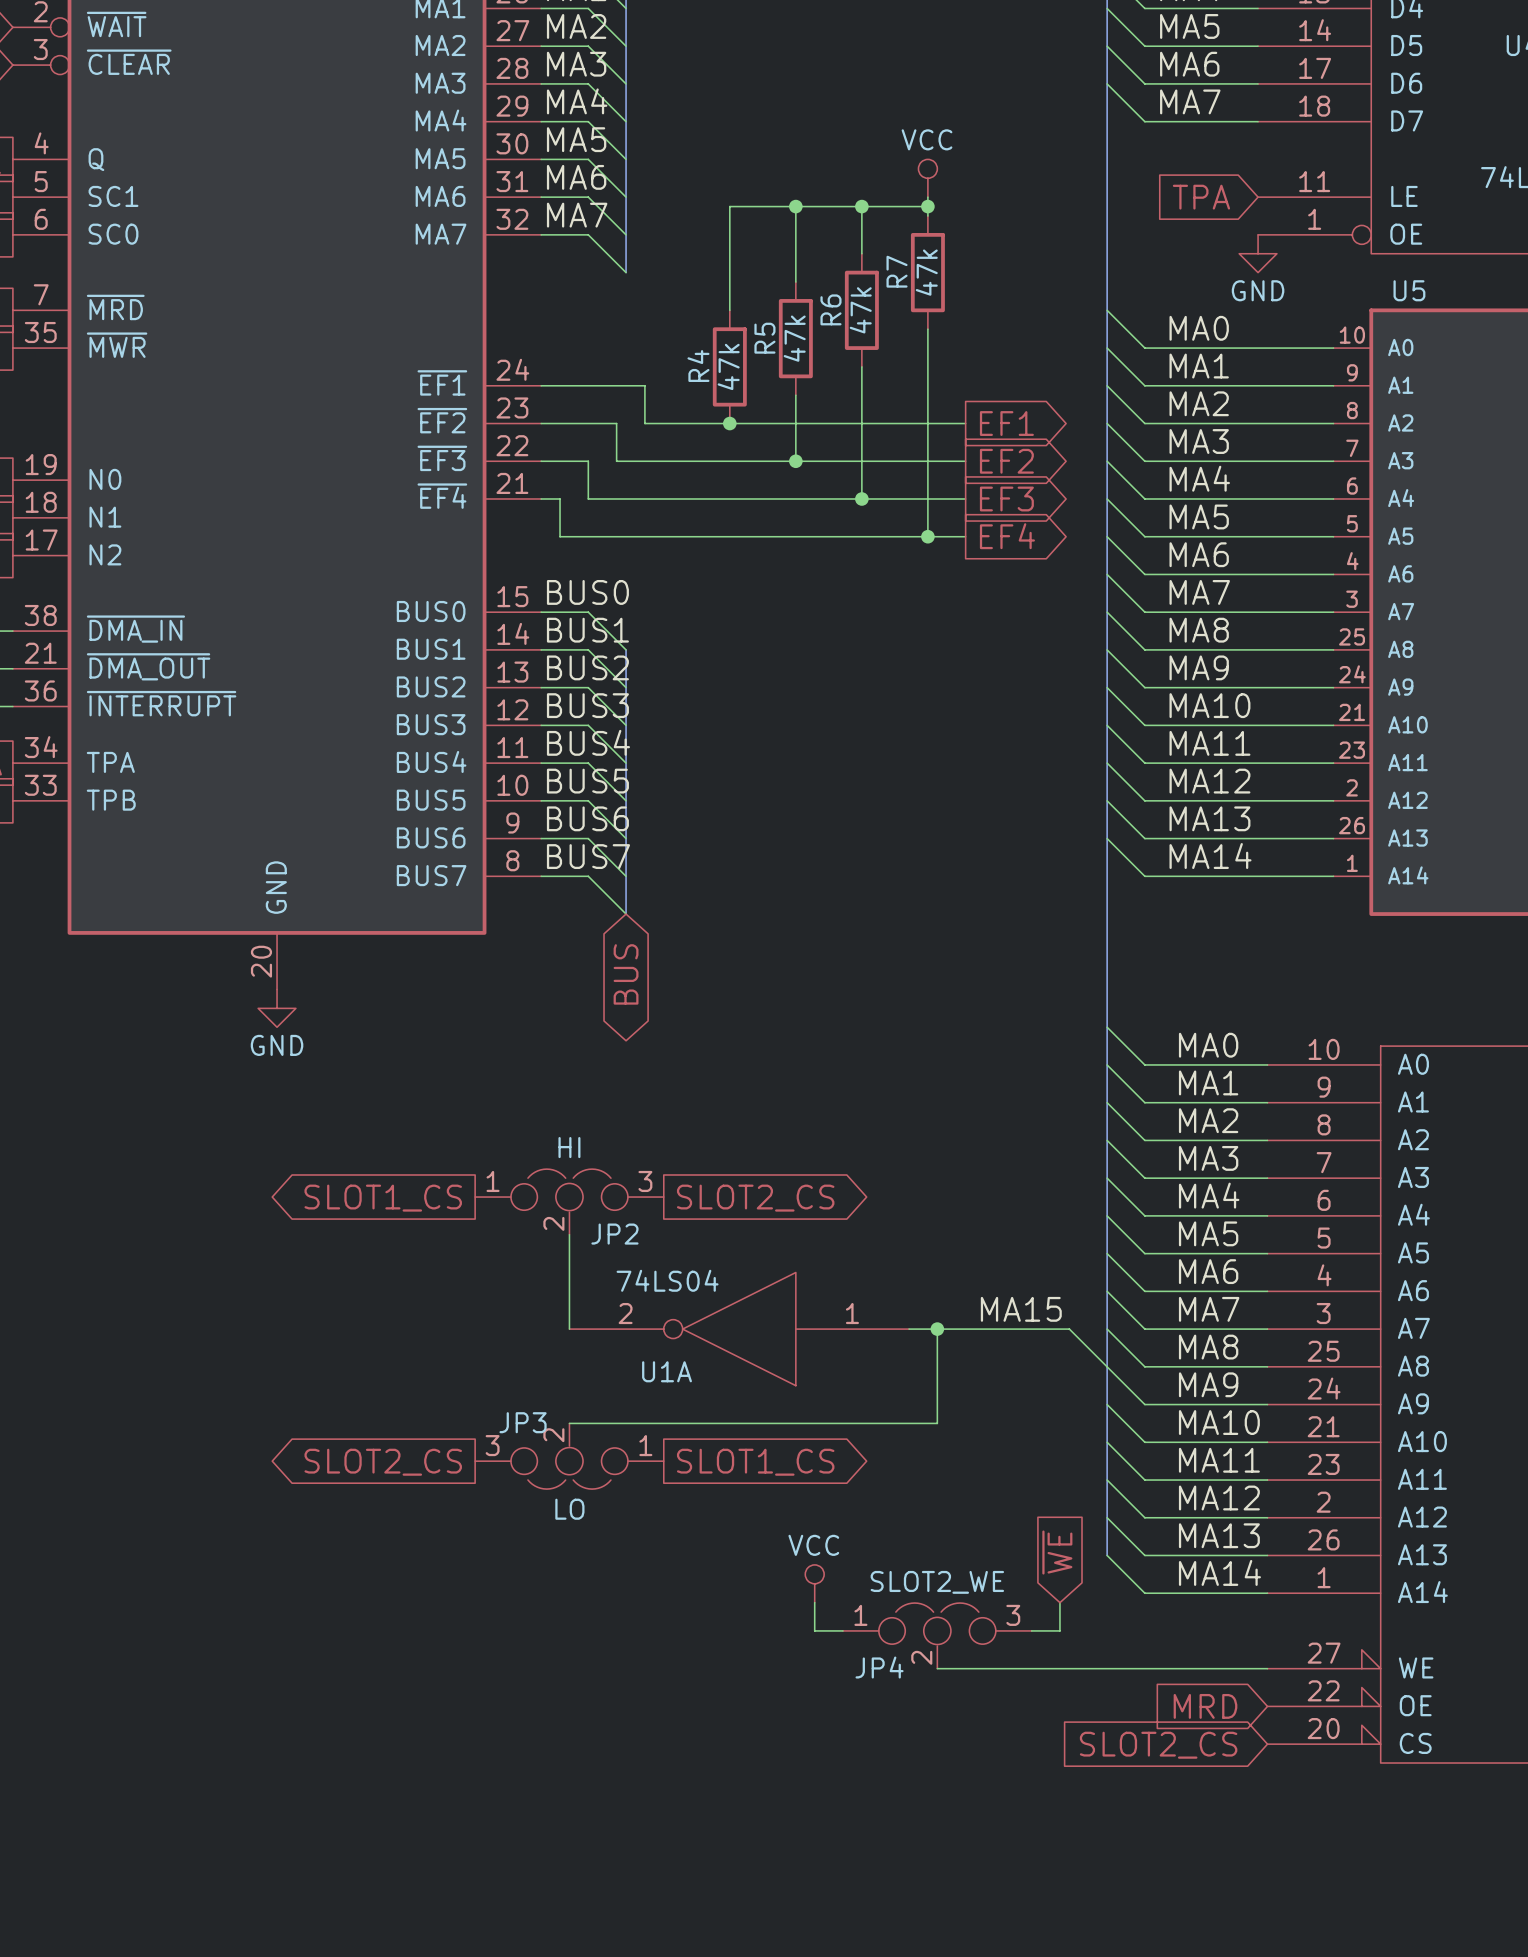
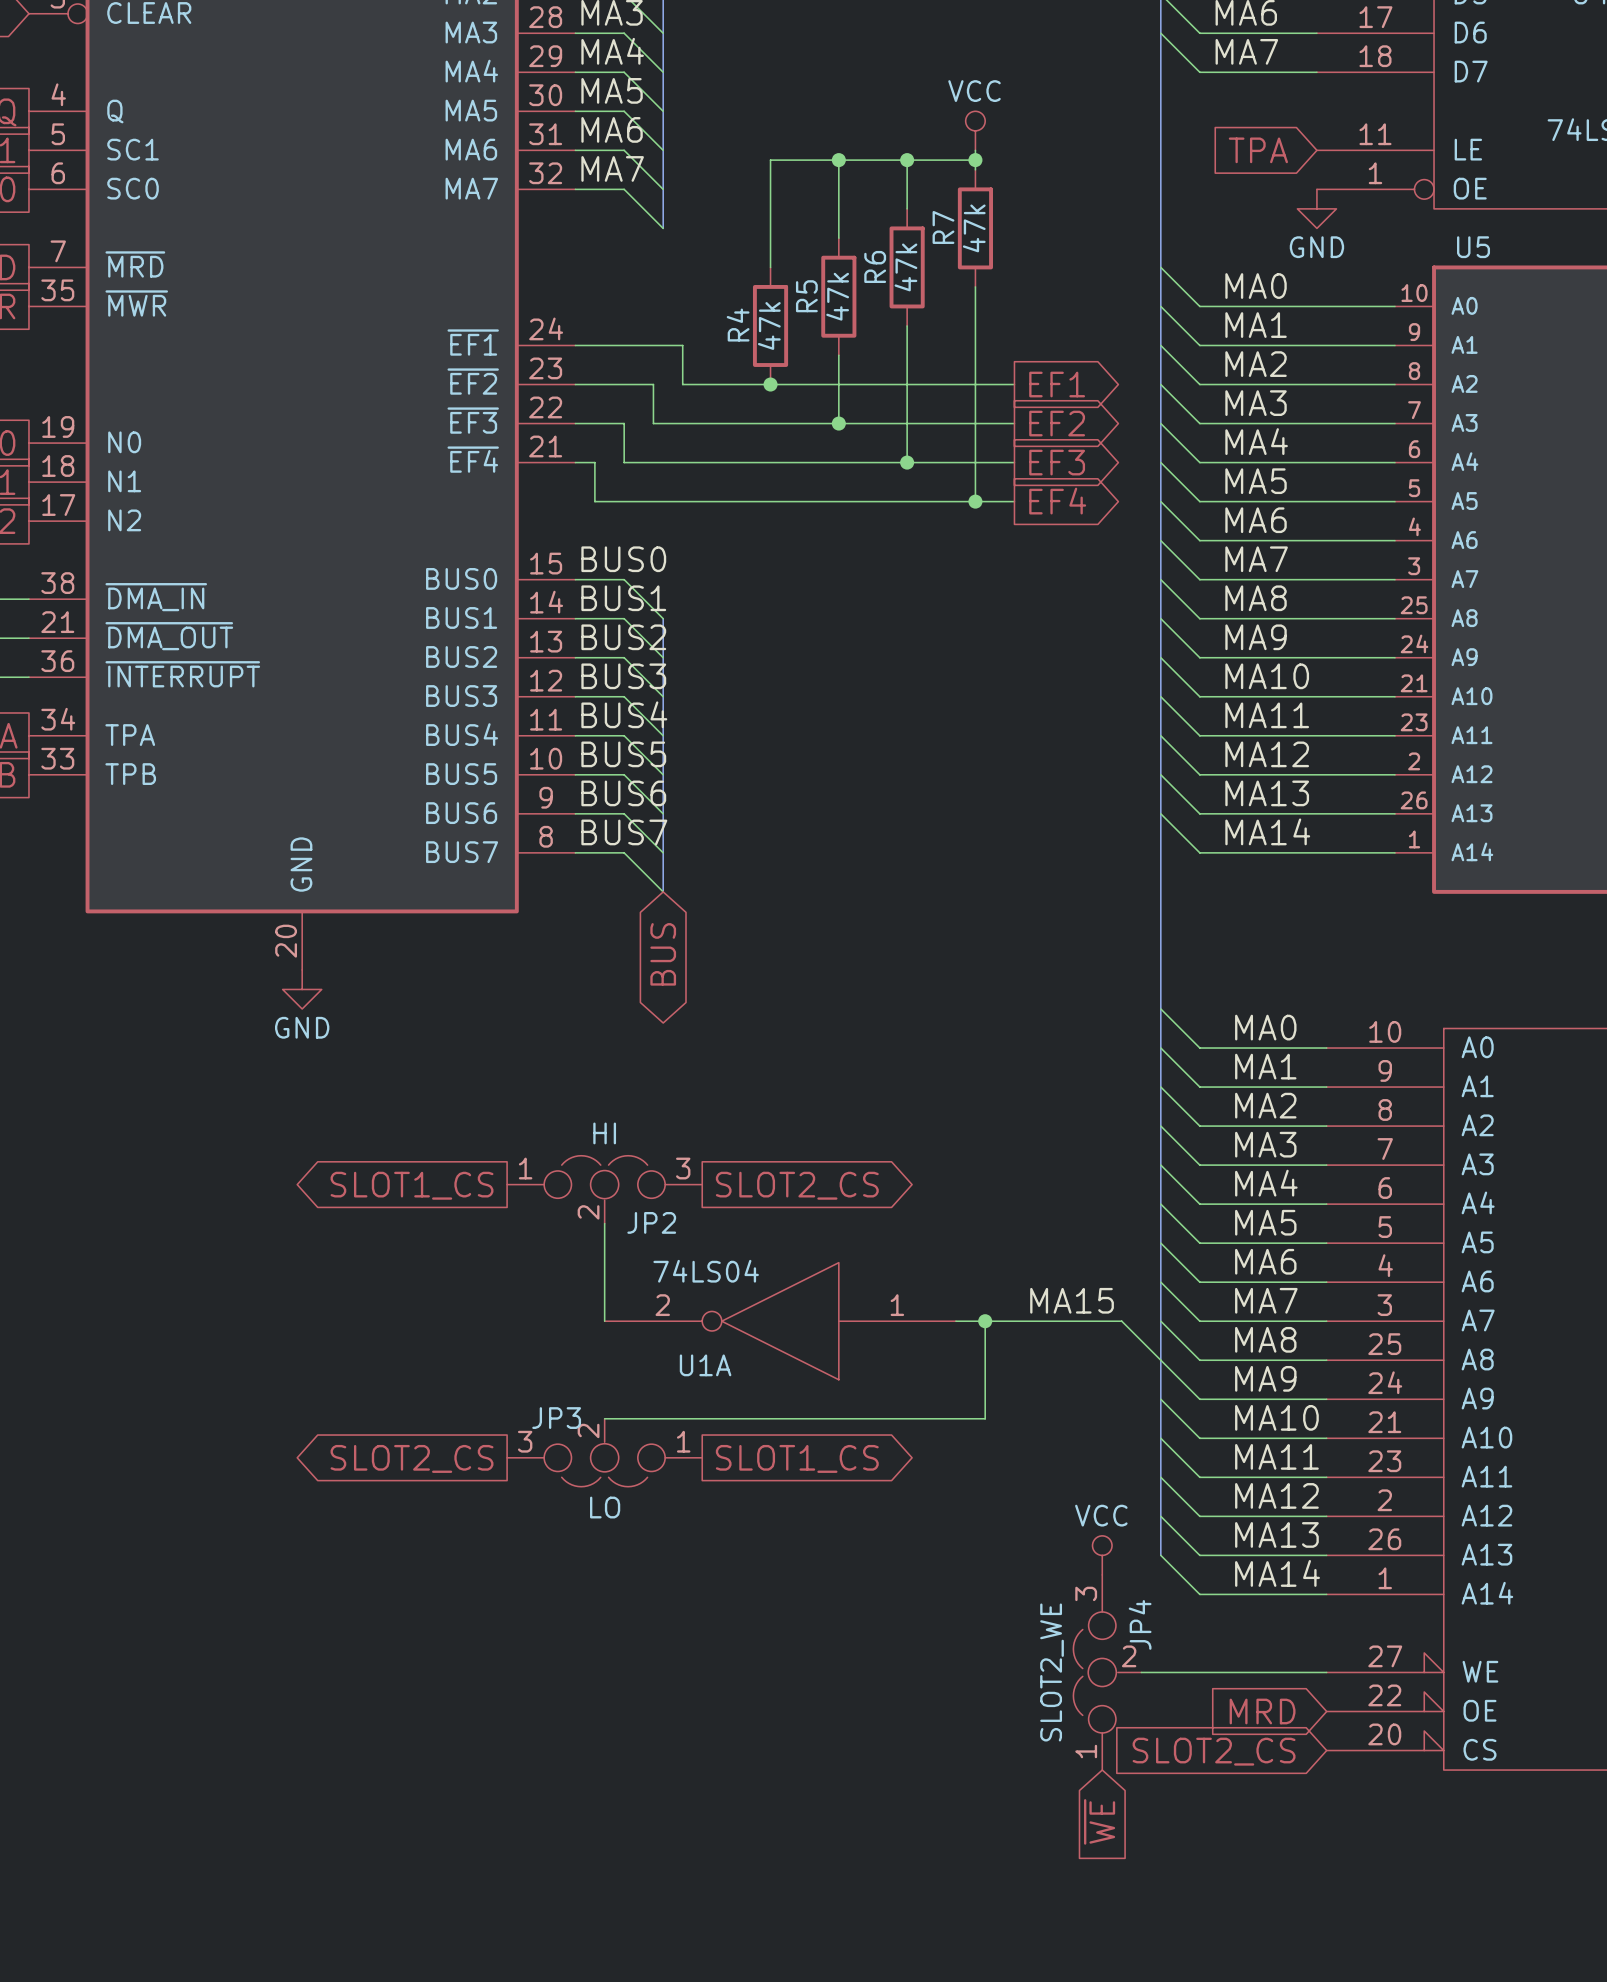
global label rotation: 0° (1057, 1552) -> 180° (1099, 1821)
global label position: ~{WE} (1057, 1552) -> ~{WE} (1099, 1821)
power symbol position: VCC (814, 1583) -> VCC (1102, 1555)
wire: (814, 1602) (814, 1630) (843, 1630) -> none
wire: (1059, 1602) (1059, 1630) (1031, 1630) -> none
JP4 rotation: 0° (937, 1623) -> 90° counterclockwise (1094, 1672)
JP4 position: (937, 1635) -> (1107, 1672)
JP4 name position: JP4 (879, 1667) -> JP4 (1140, 1624)
wire: (937, 1668) (1088, 1668) -> none

